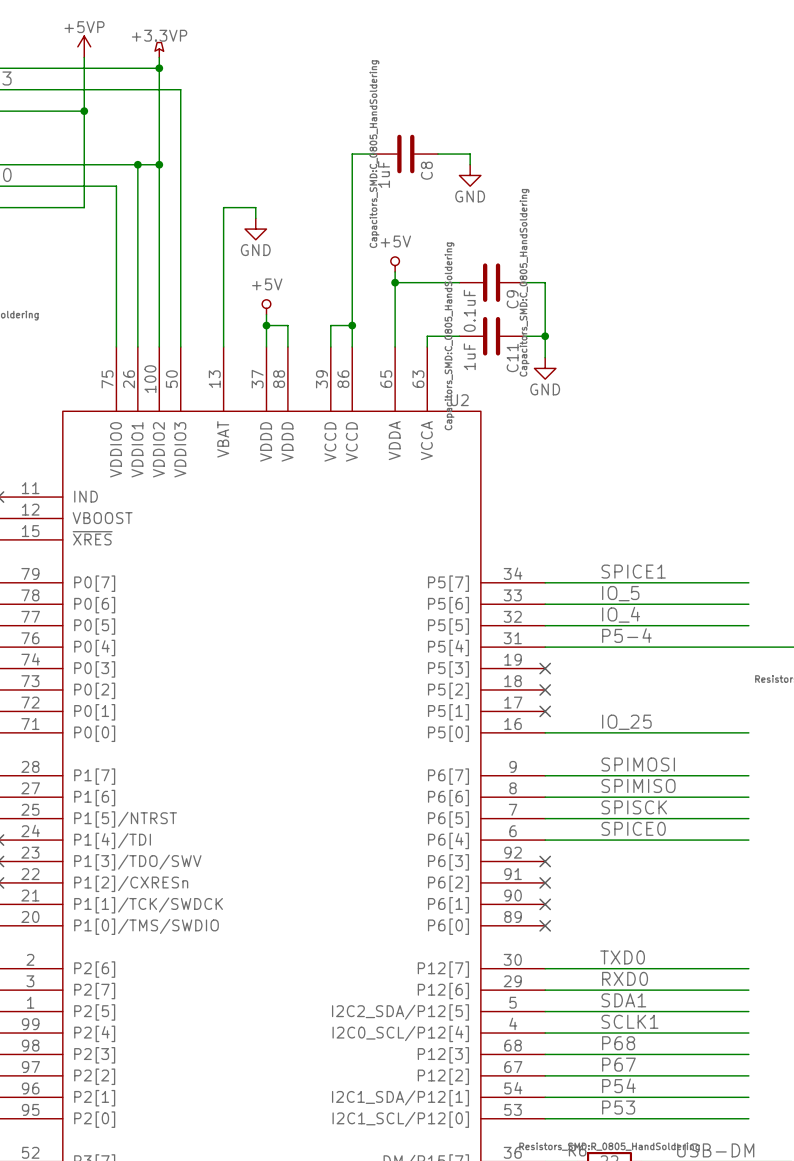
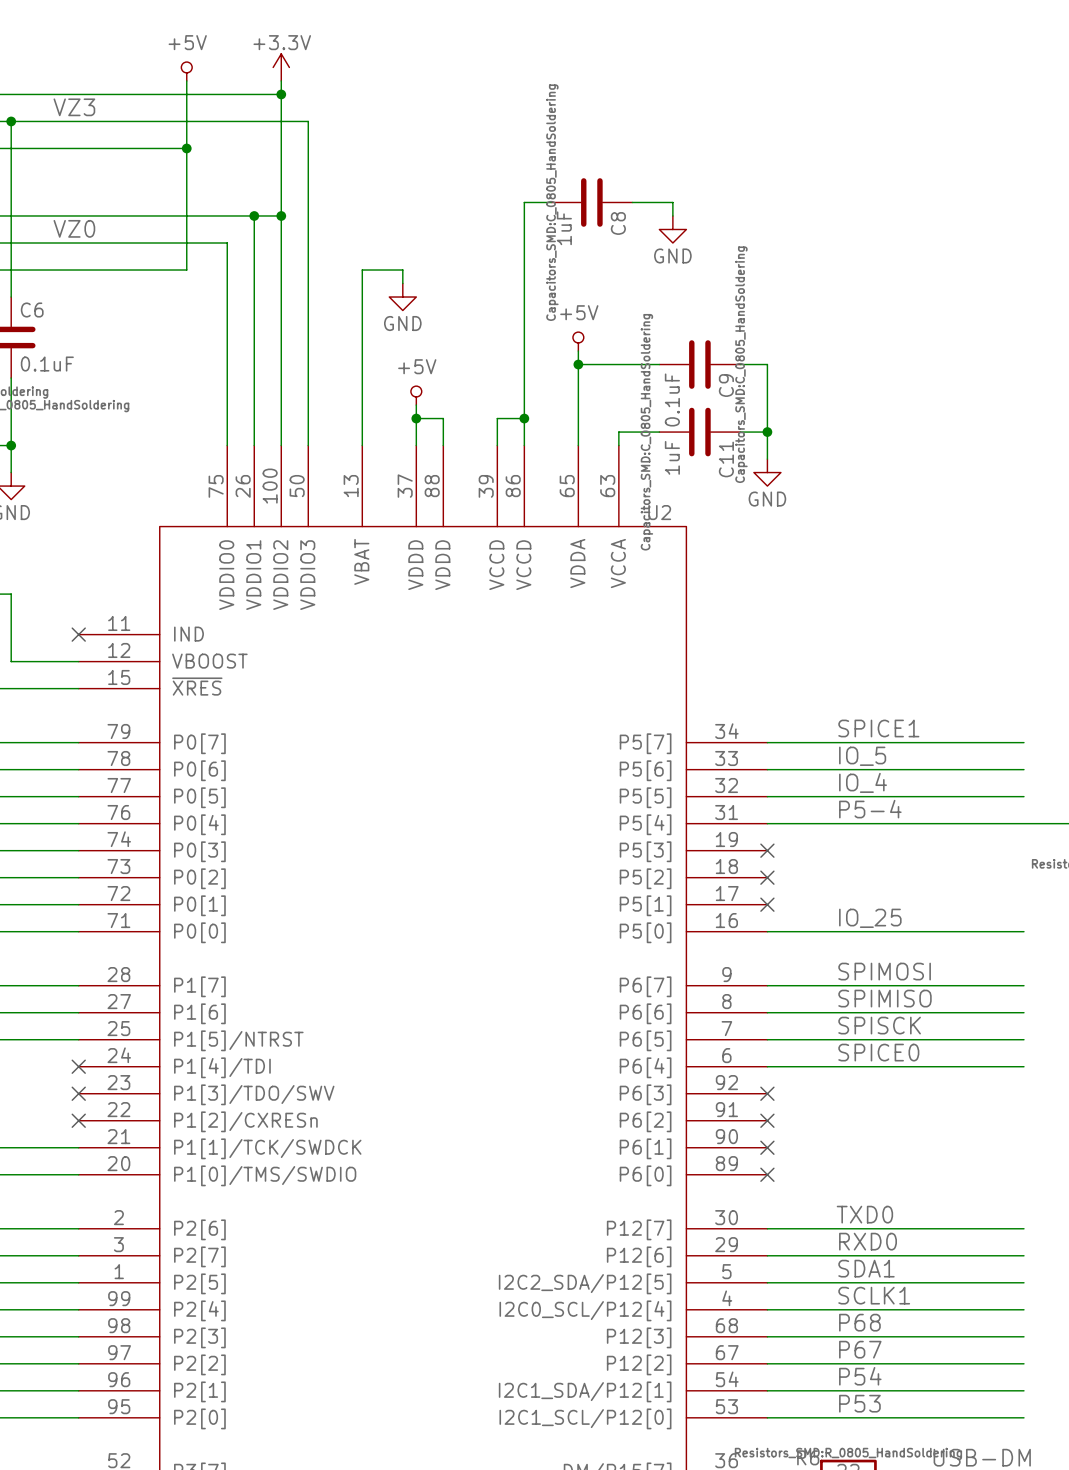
power symbol: +5VP (84, 46) -> +5V (186, 71)
power symbol: +3.3VP (159, 50) -> +3.3V (281, 67)

